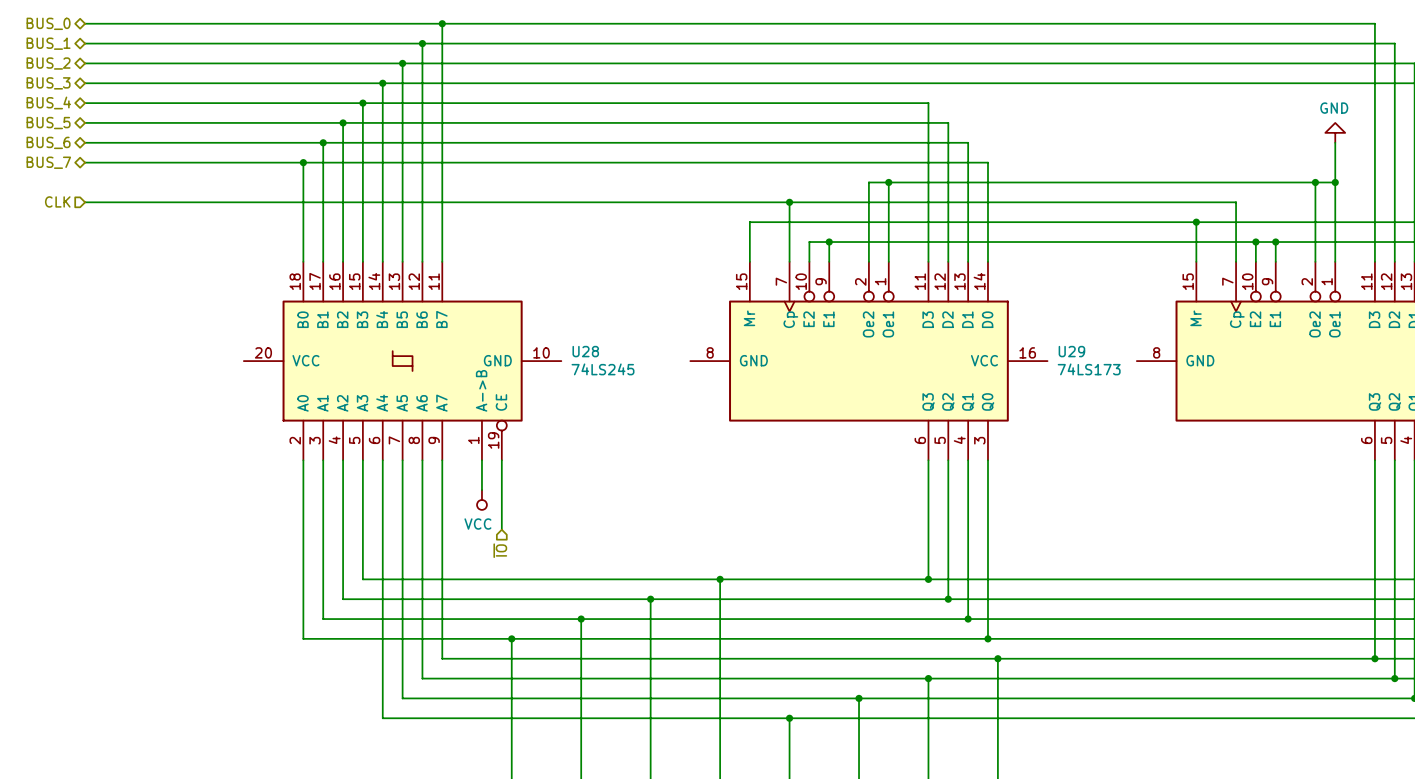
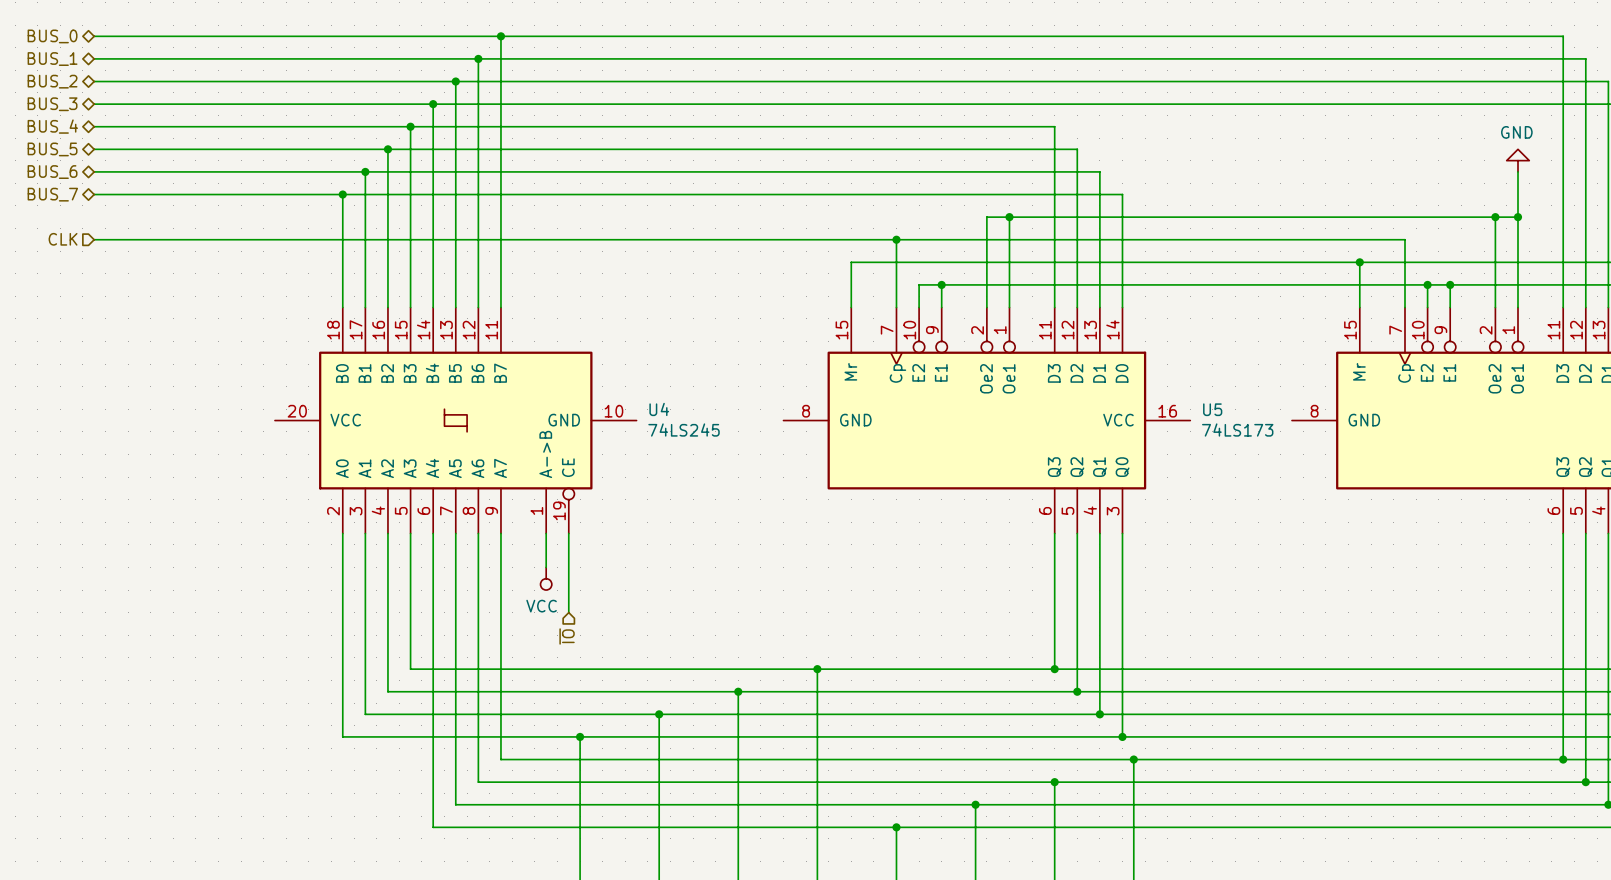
U28 name: U28 (585, 351) -> U4 (659, 409)
U29 name: U29 (1071, 351) -> U5 (1212, 409)

